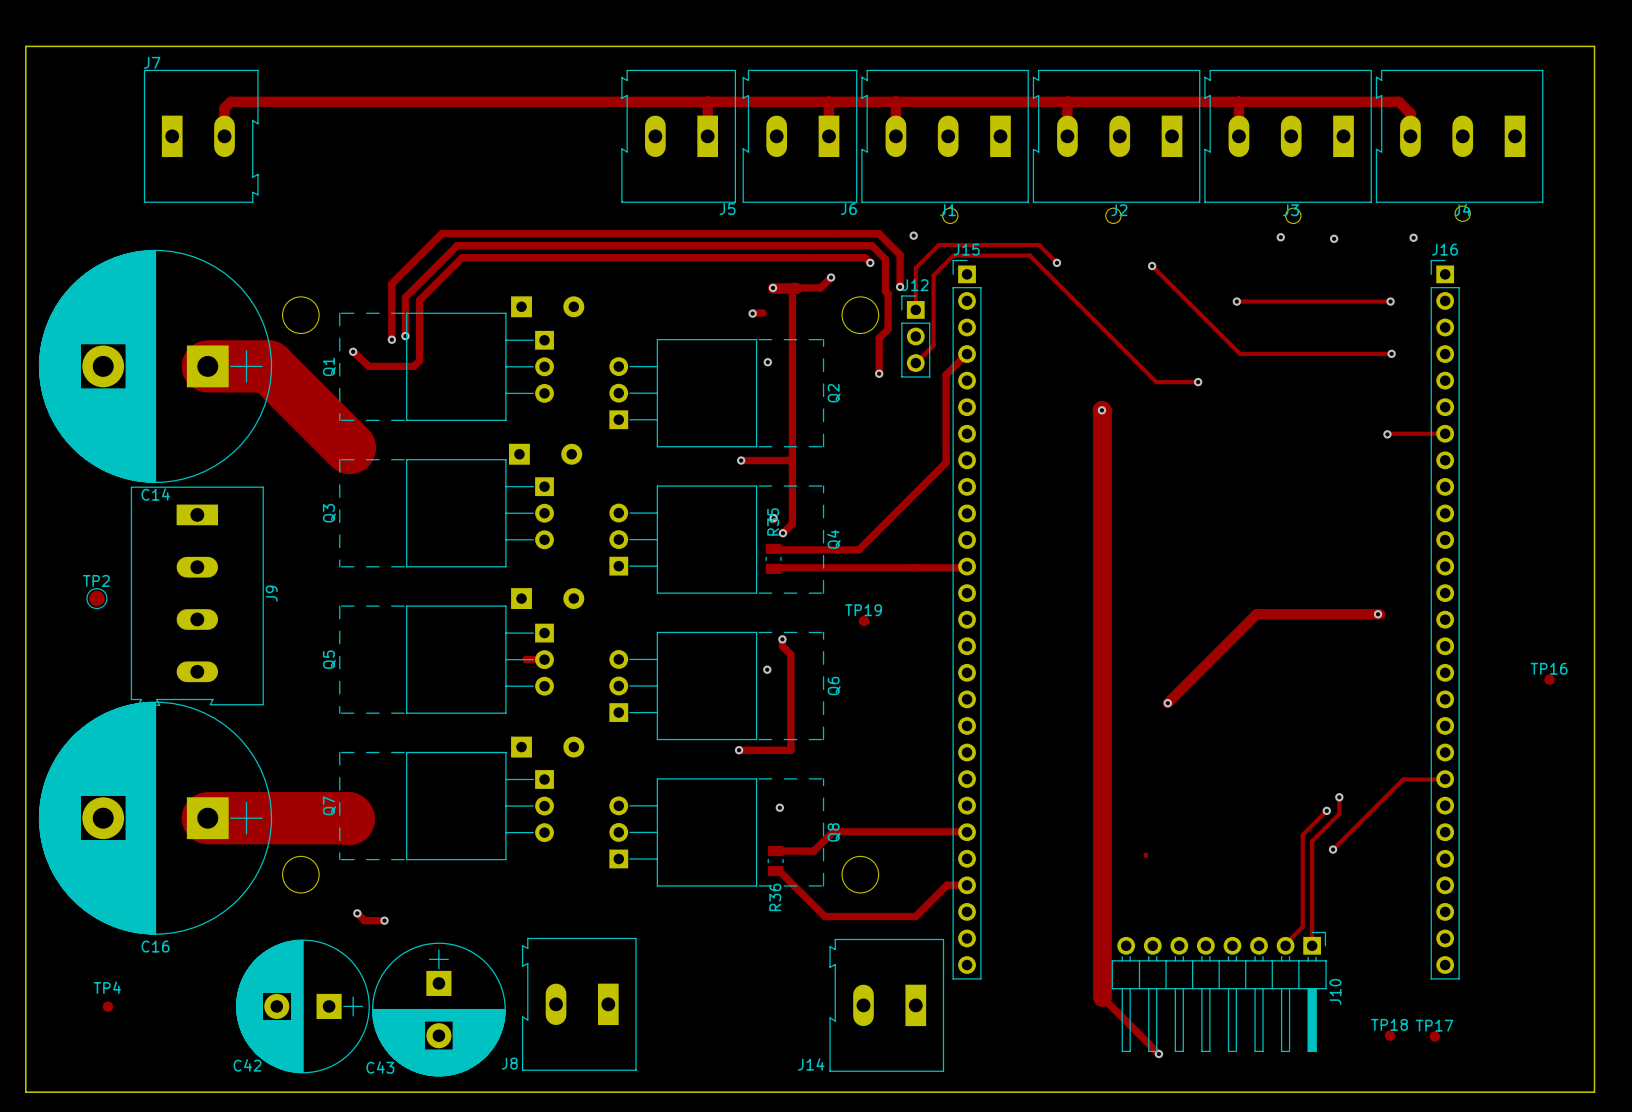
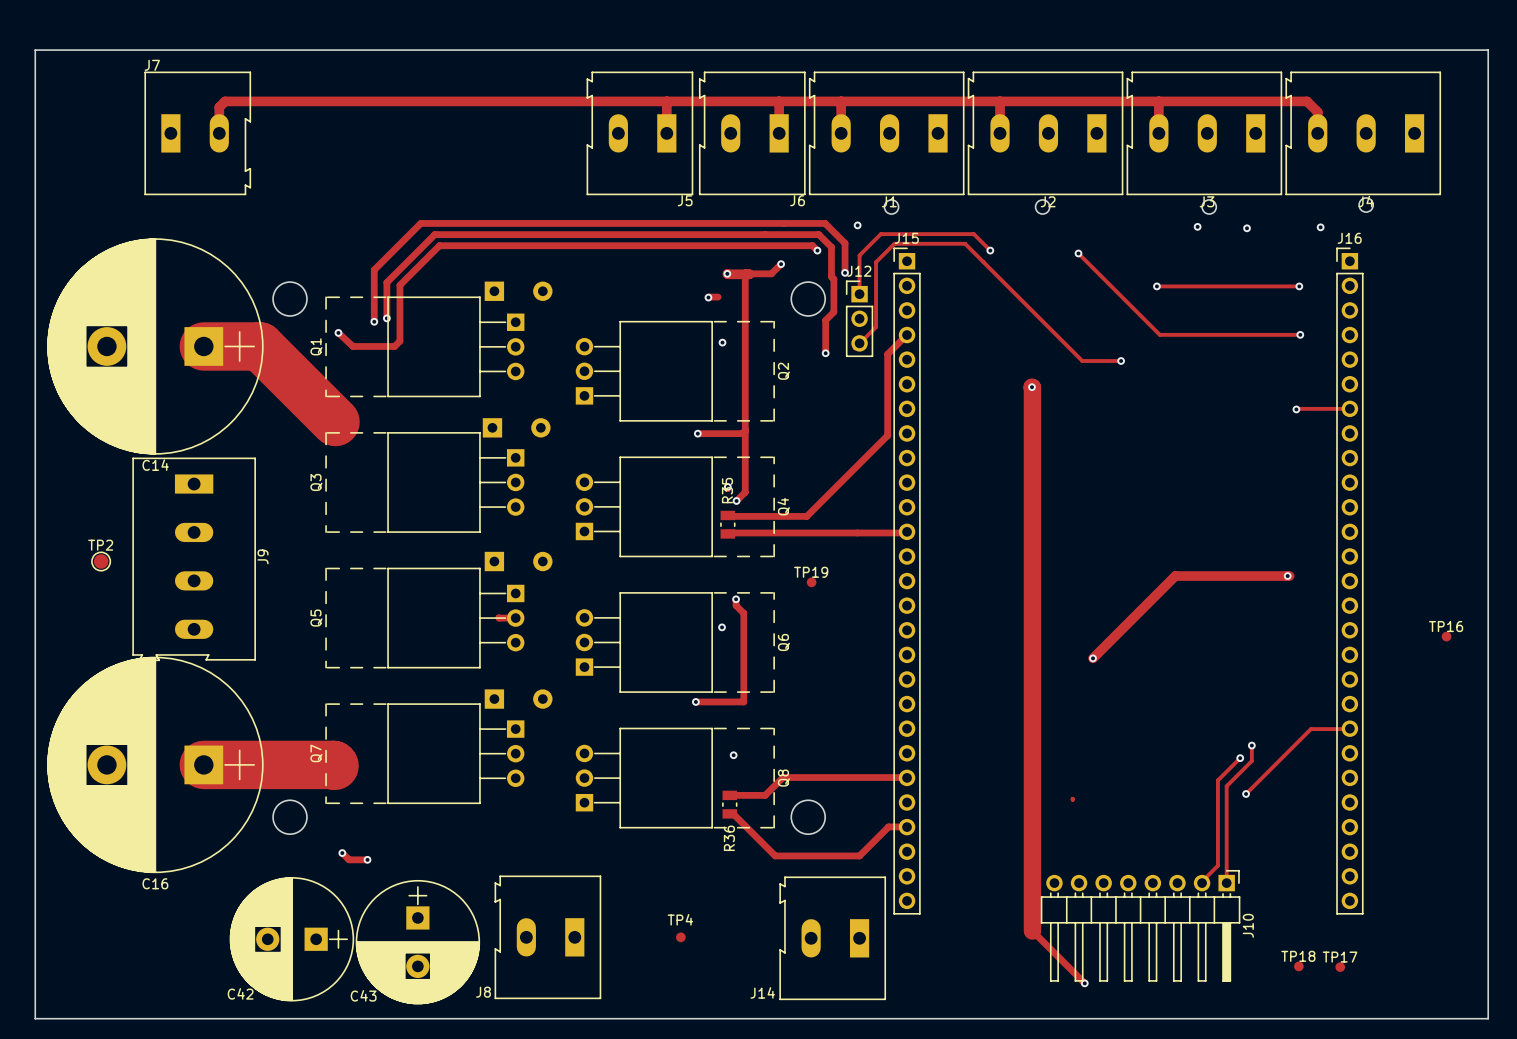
TP4 position: (107, 1006) -> (680, 937)

